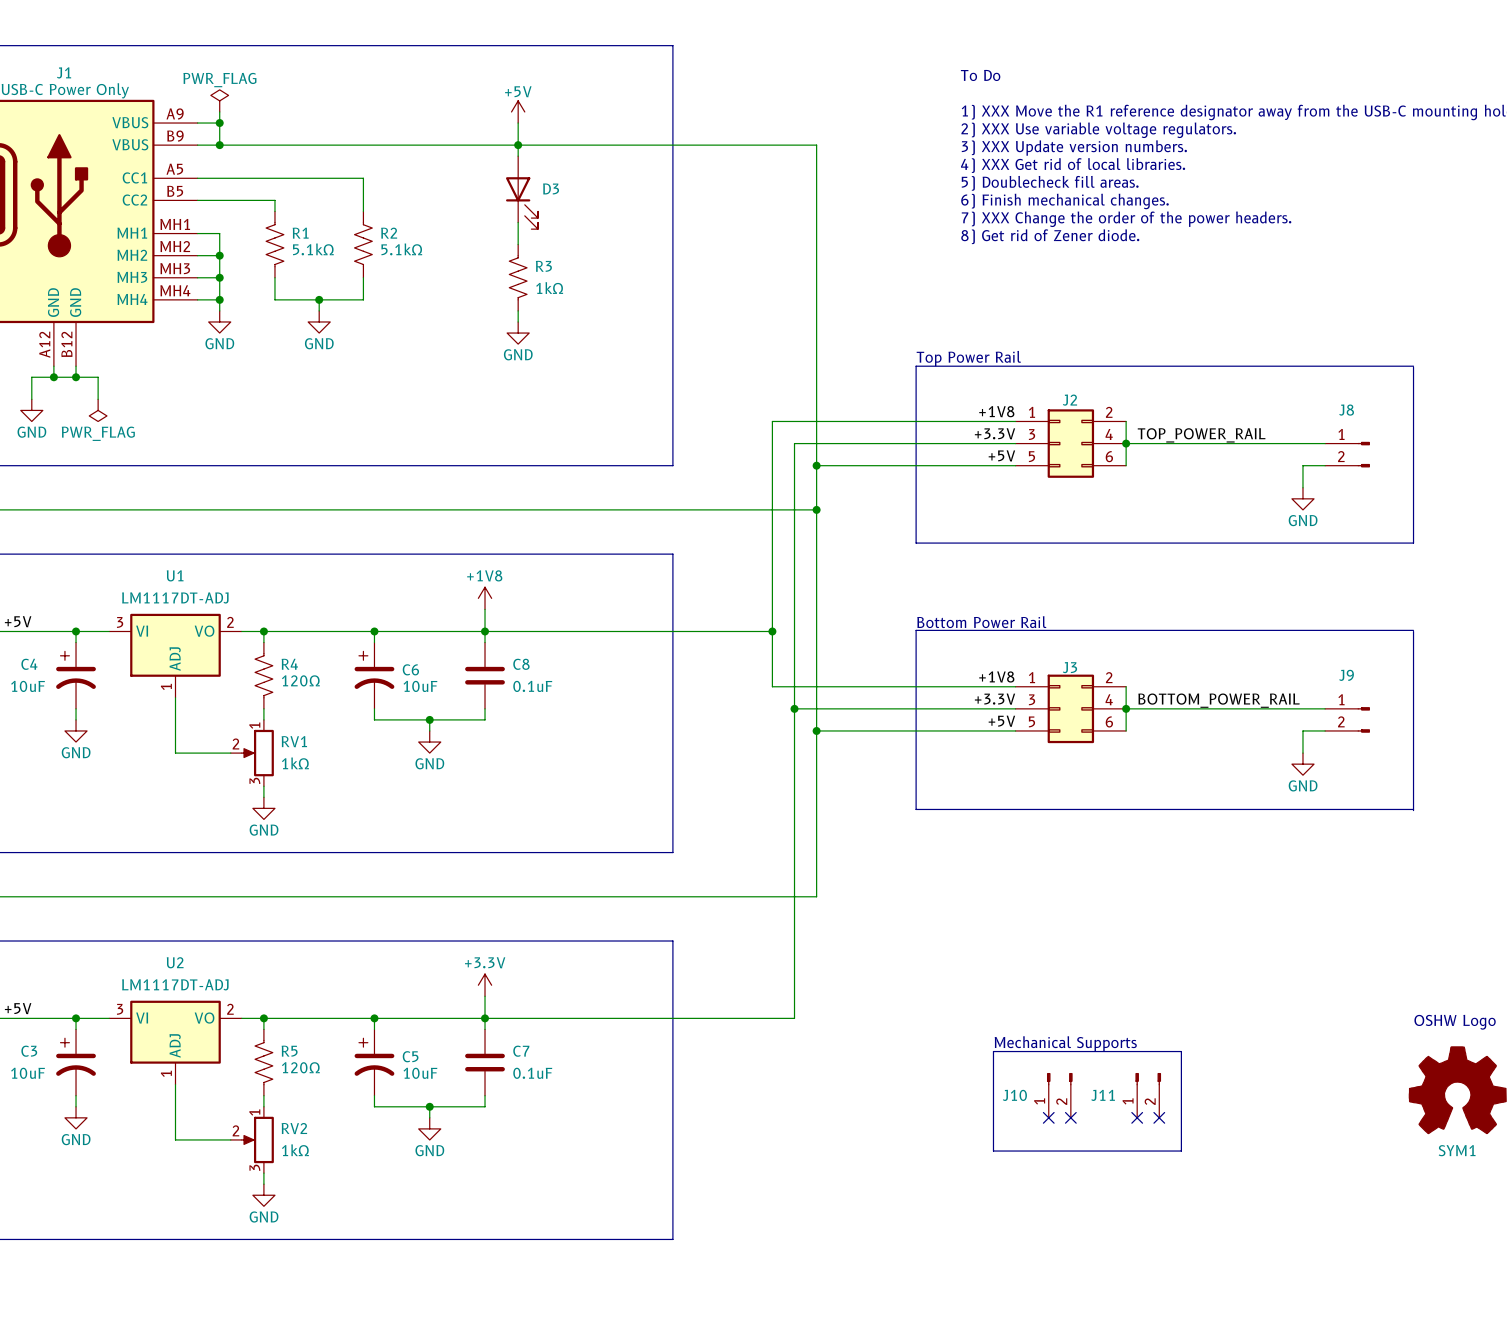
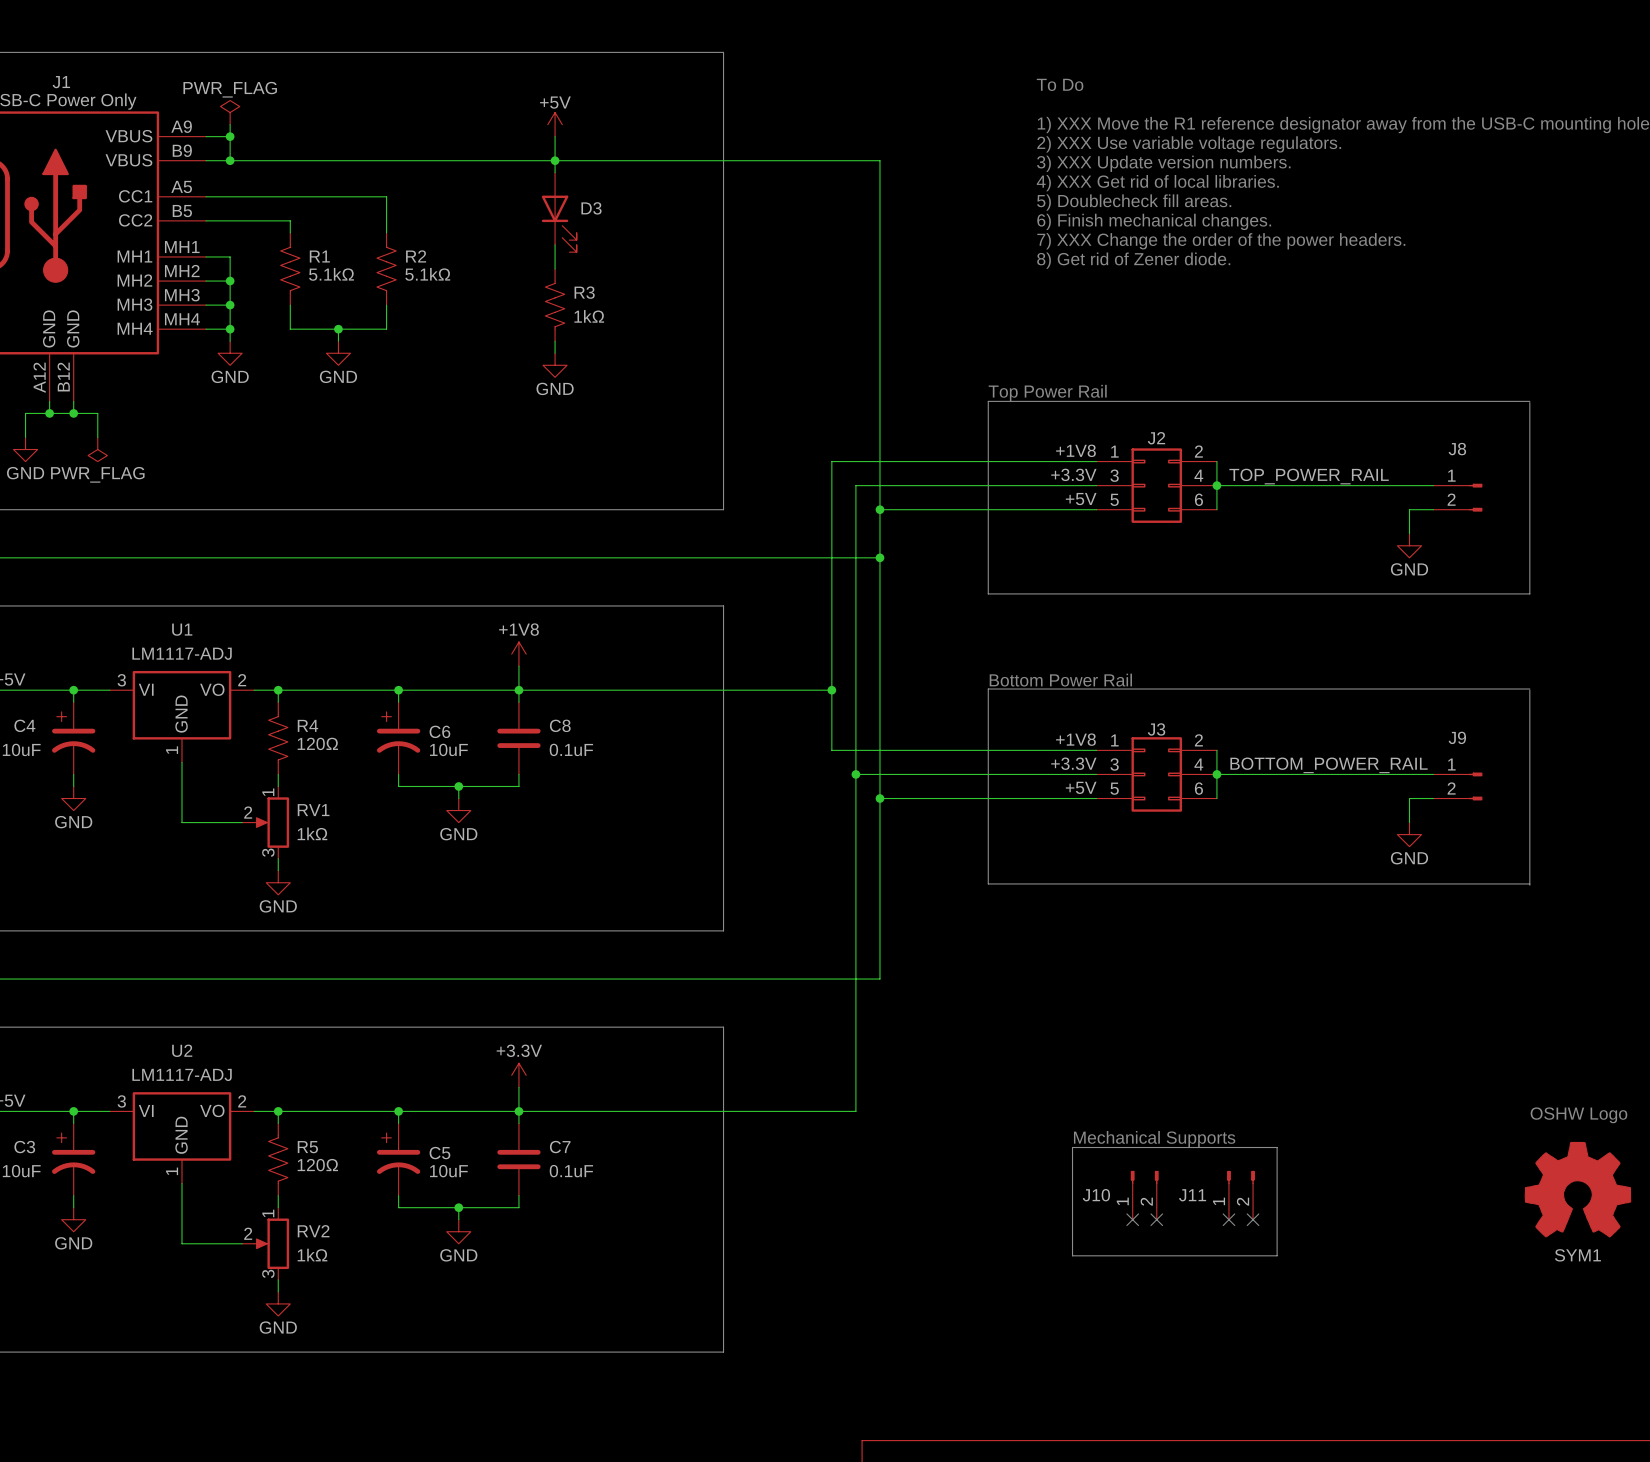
U1 value: LM1117DT-ADJ (175, 597) -> LM1117-ADJ (182, 653)
U1 pin name: ADJ (175, 659) -> GND (181, 714)
U2 value: LM1117DT-ADJ (175, 984) -> LM1117-ADJ (182, 1074)
U2 pin name: ADJ (175, 1045) -> GND (181, 1135)

